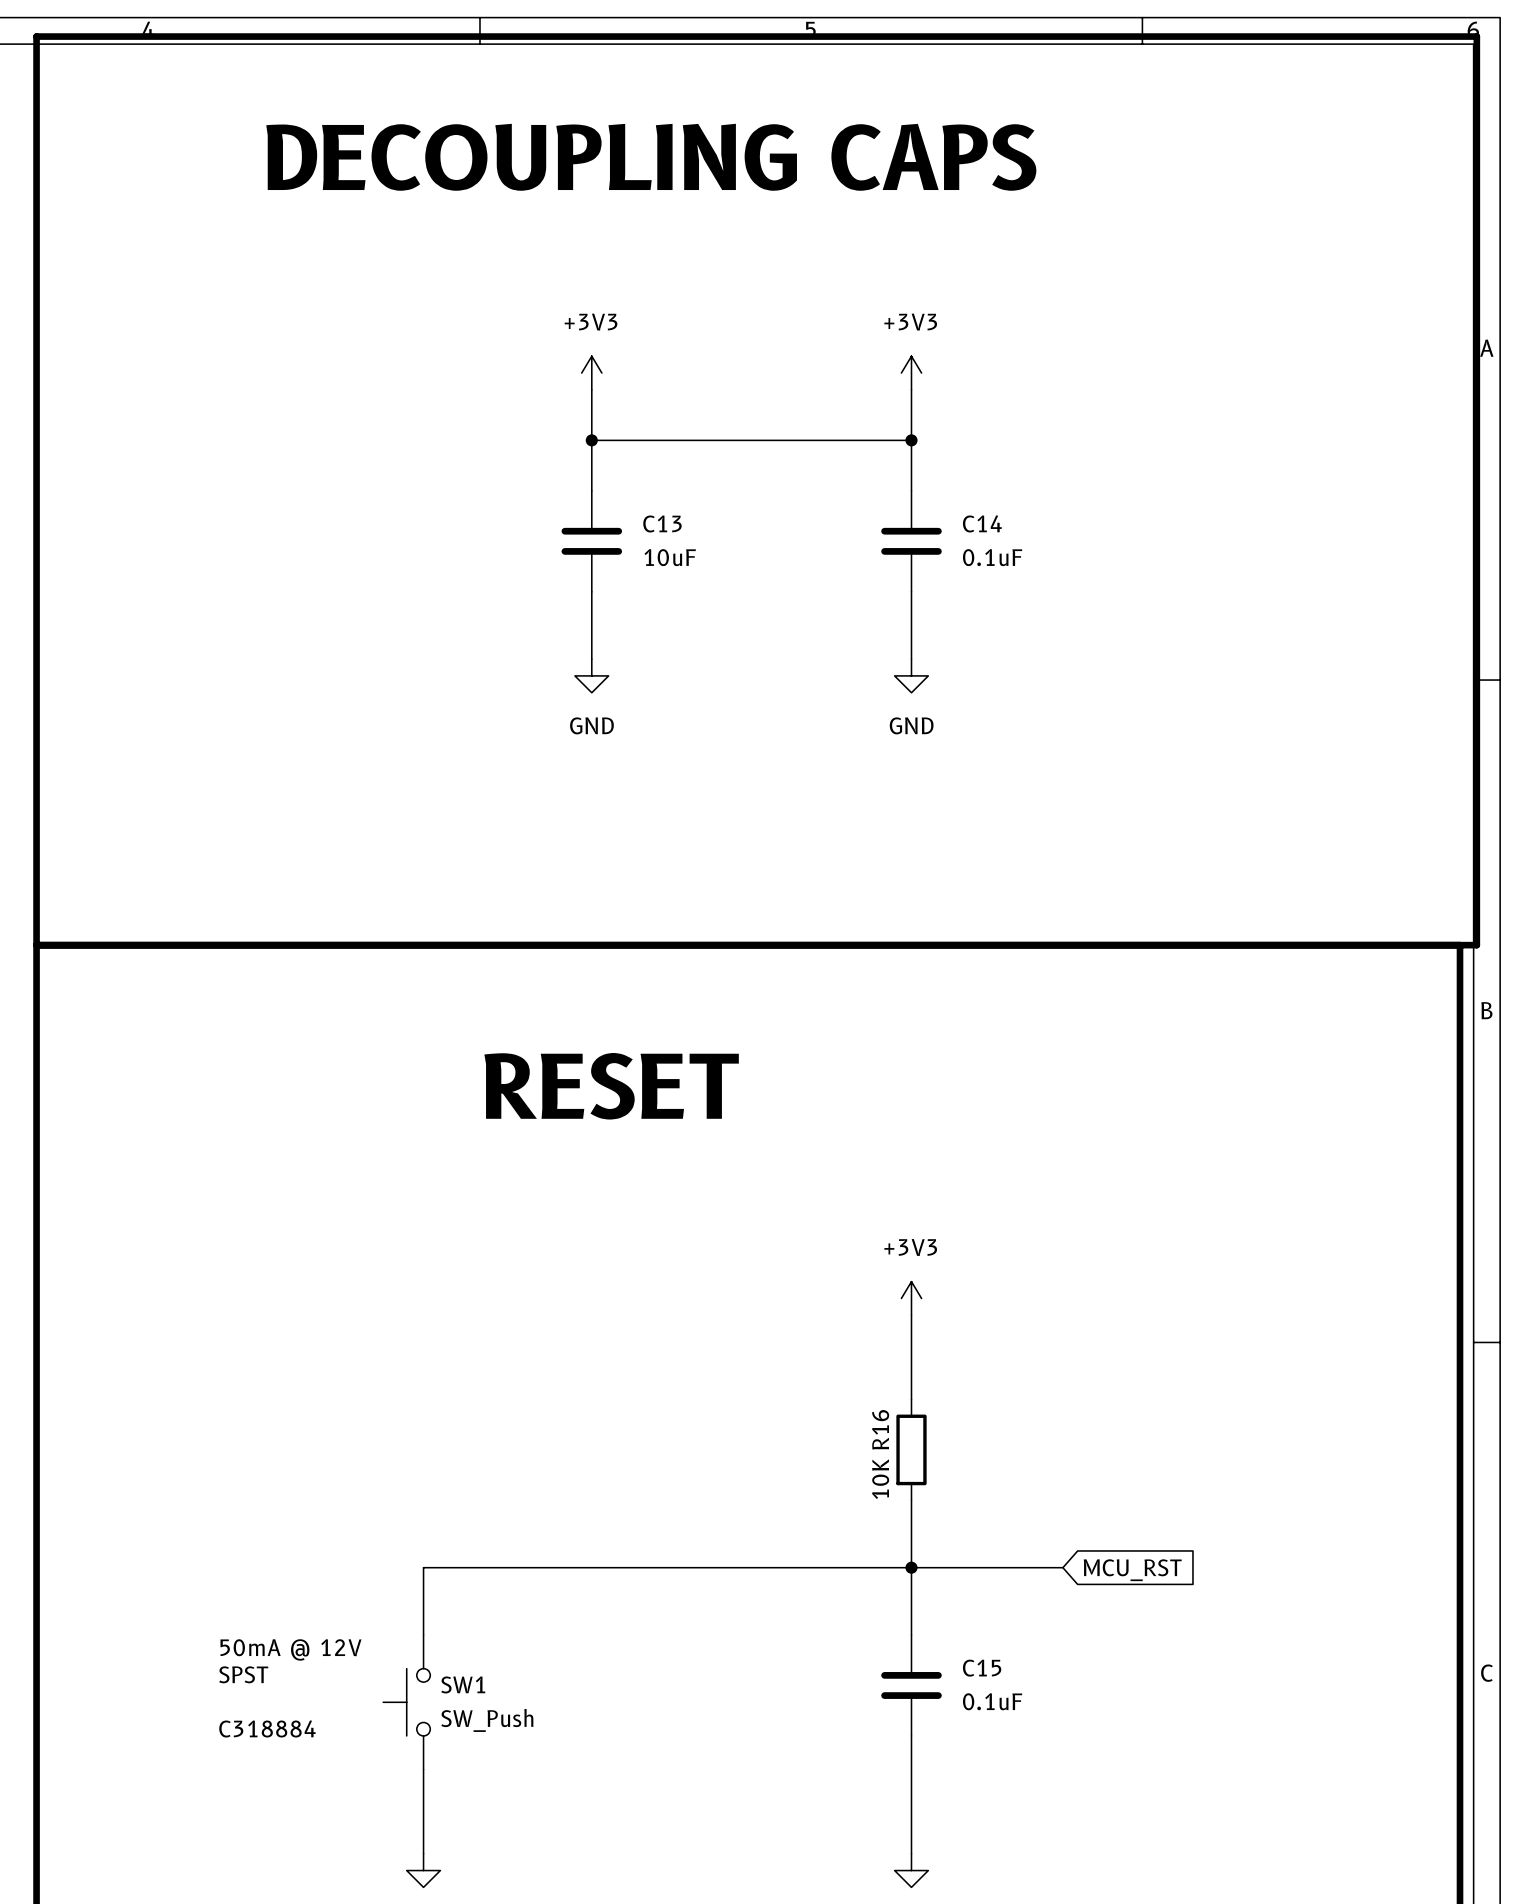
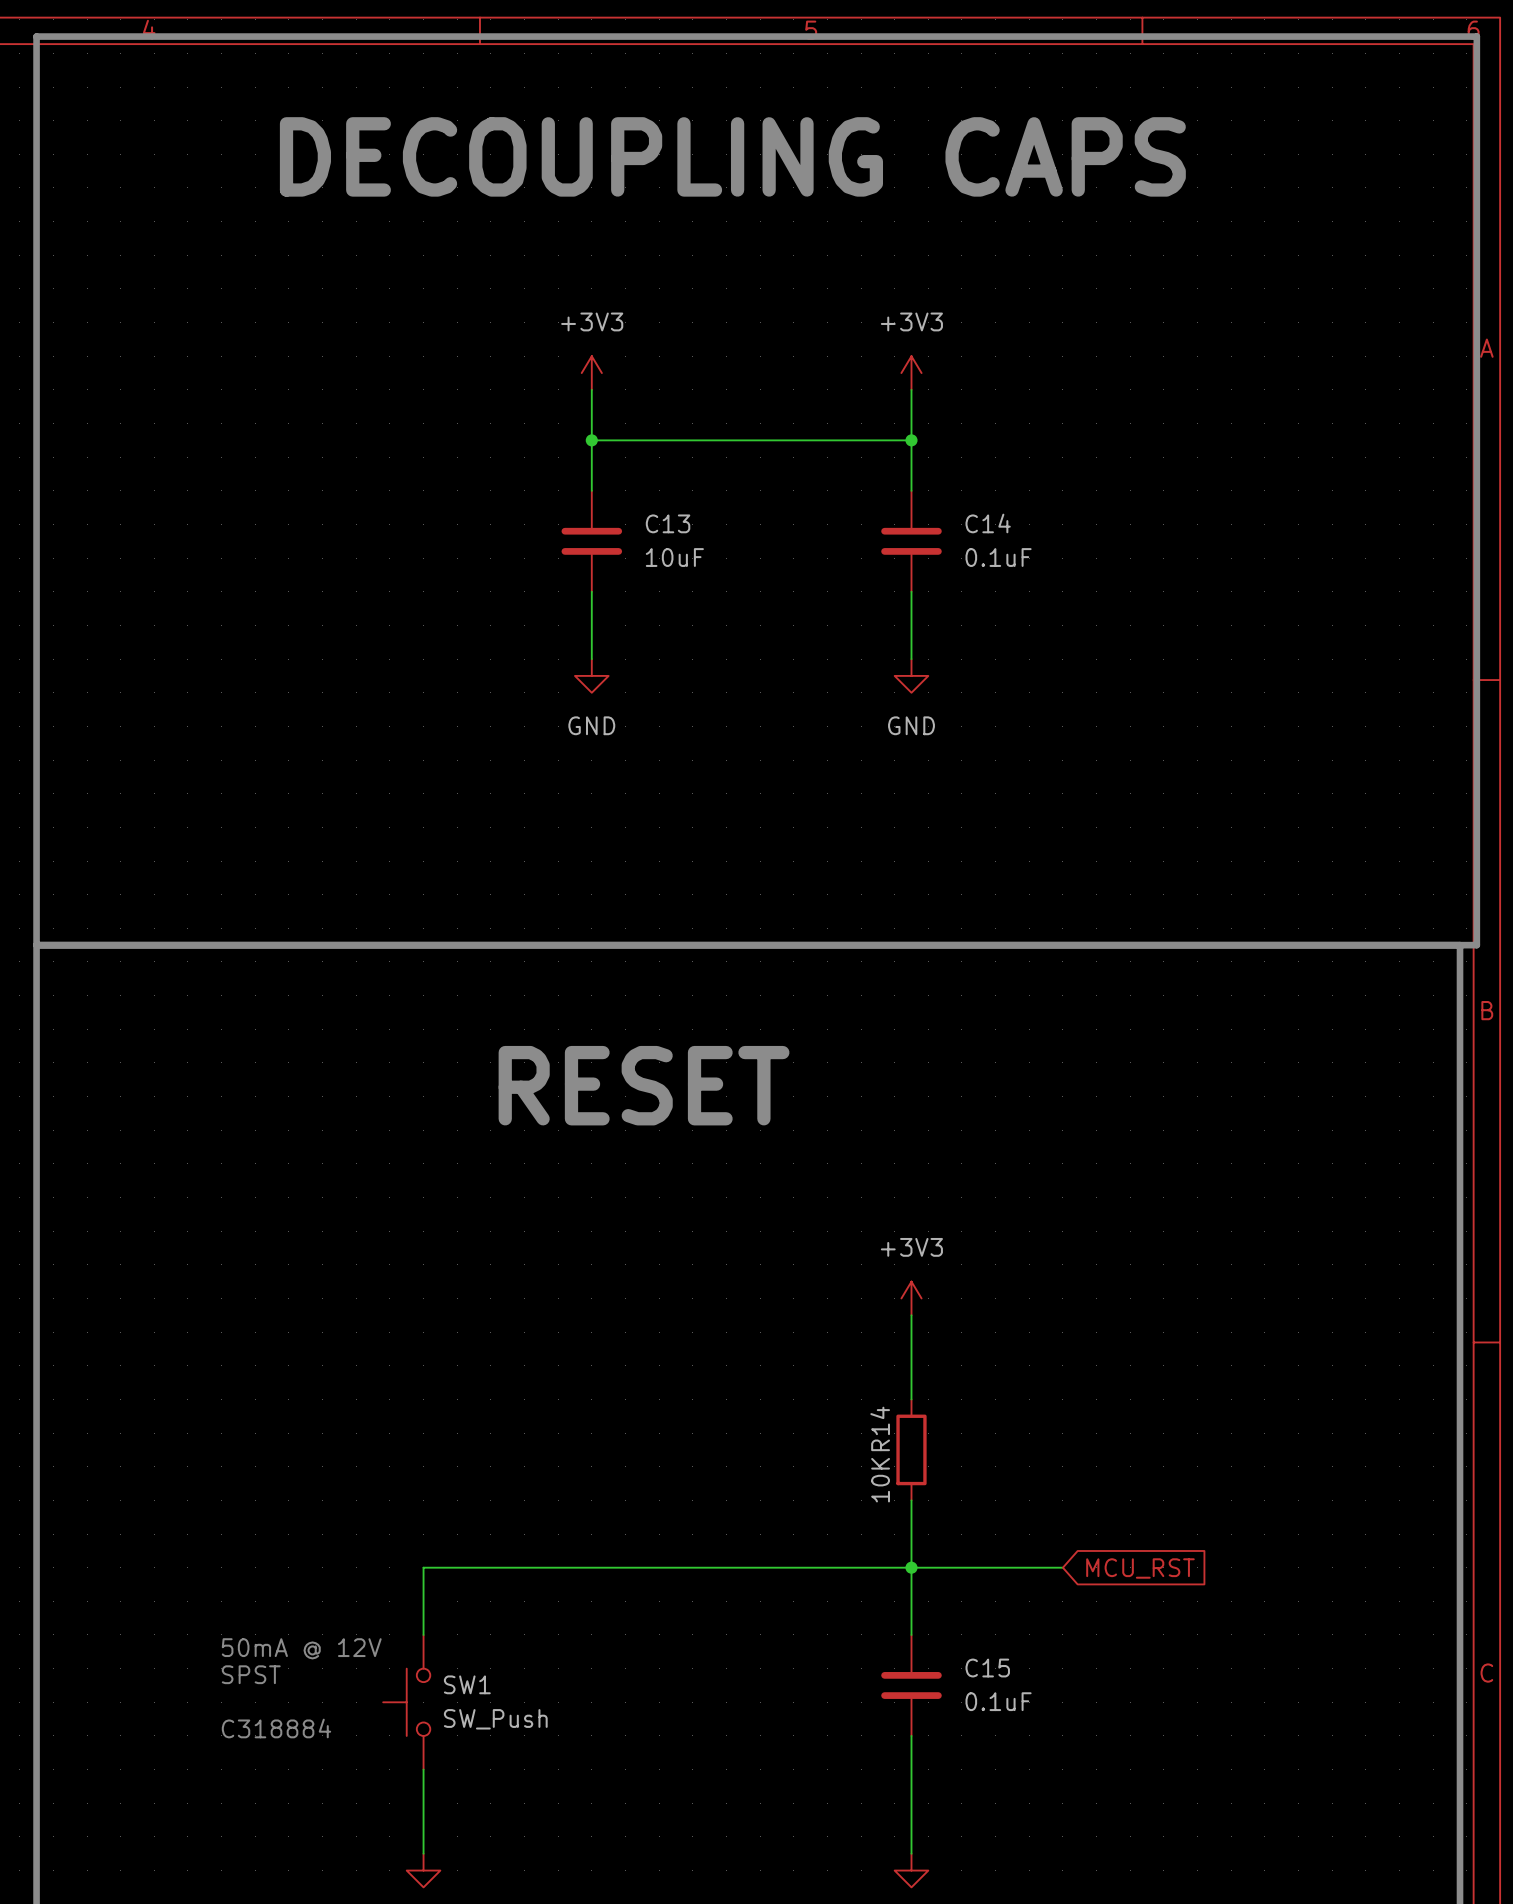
R16 name: R16 (880, 1429) -> R14 (880, 1428)

